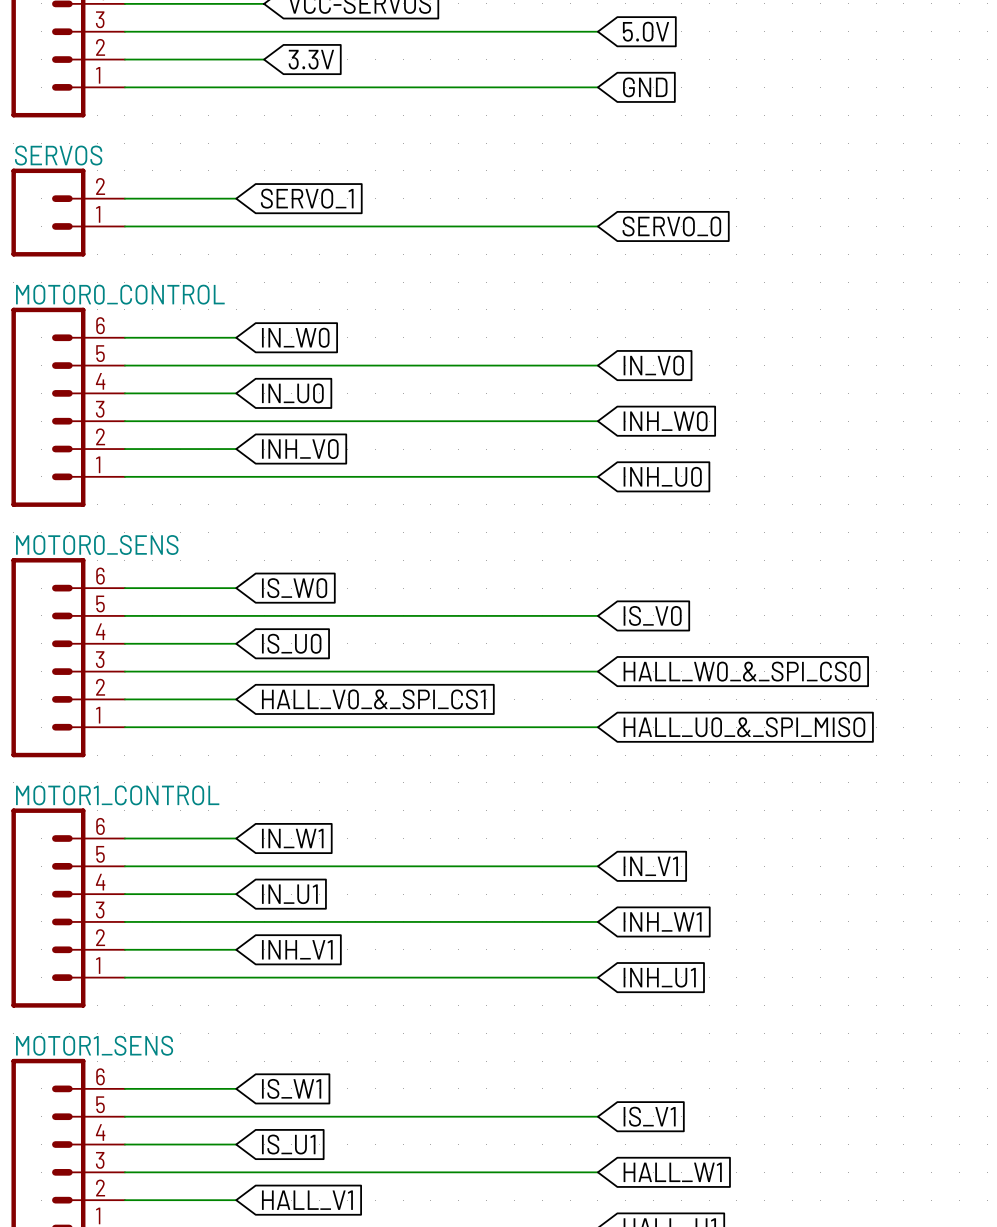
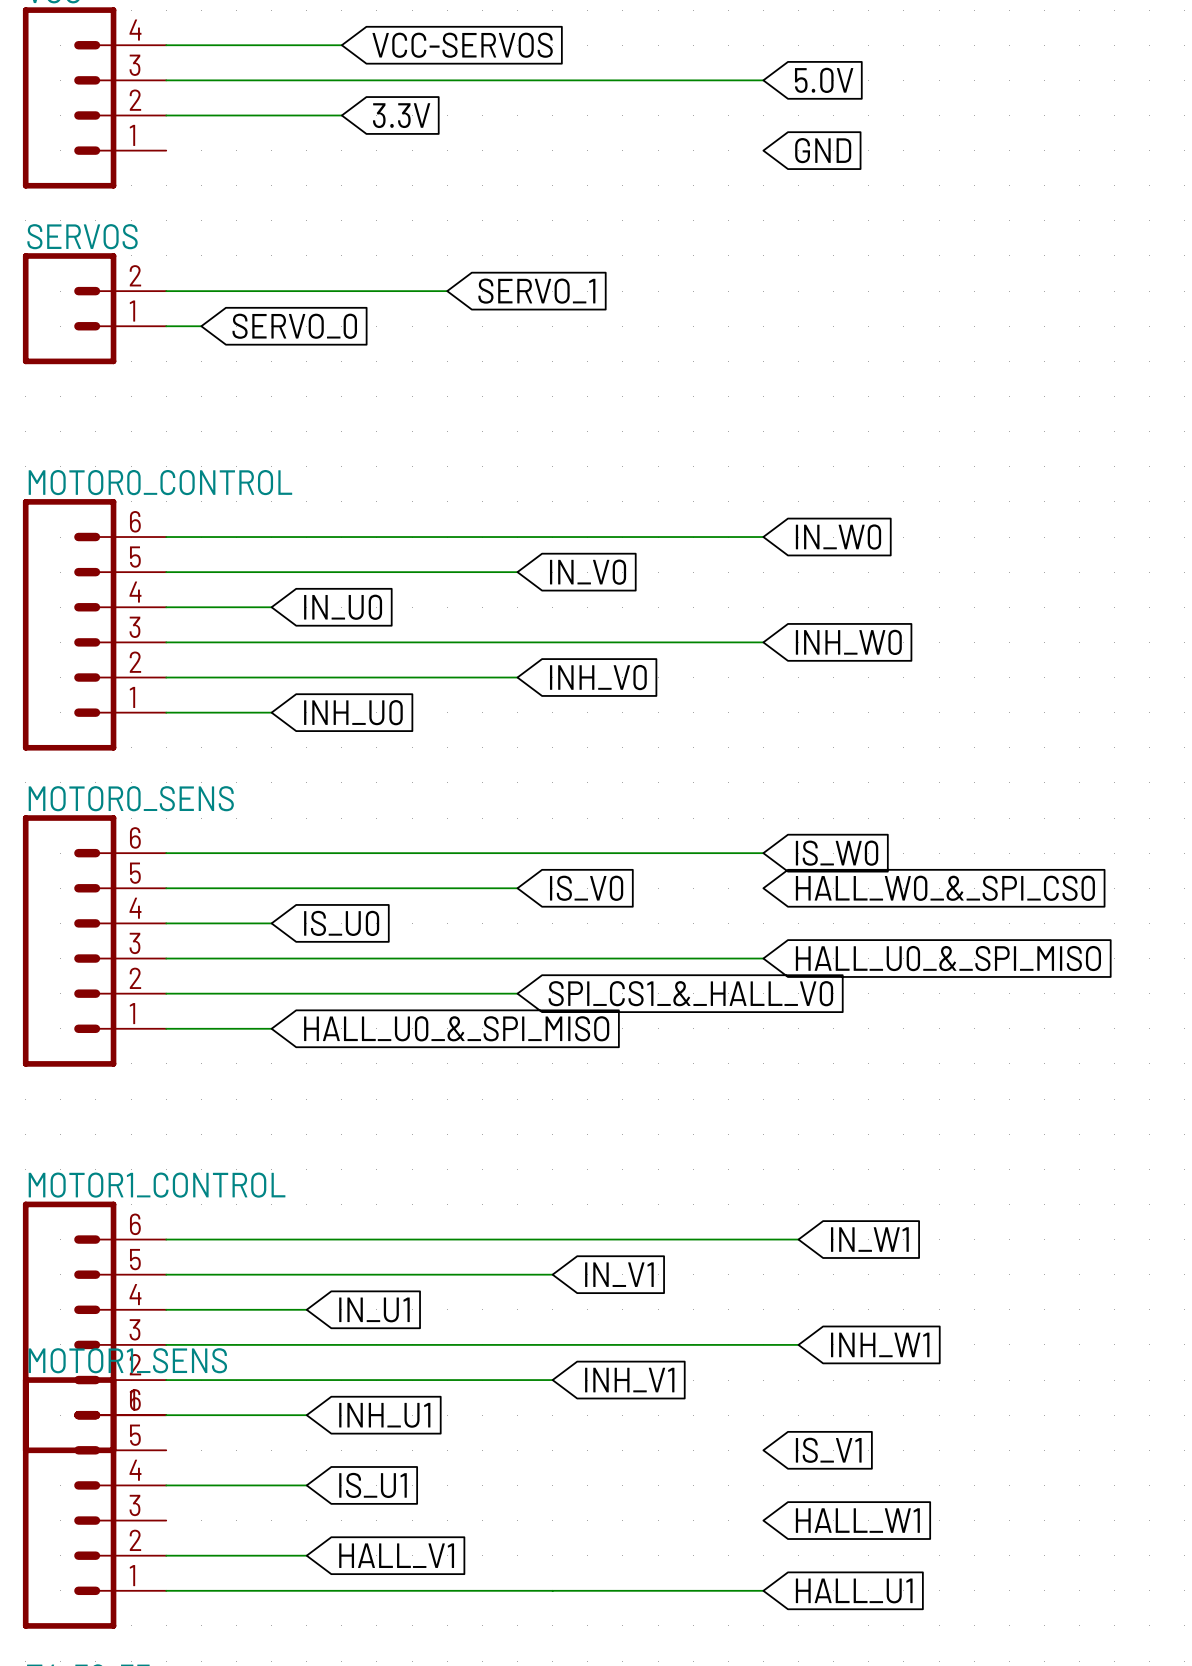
wire: (124, 87) (597, 87) -> none
global label position: SERVO_1 (307, 198) -> SERVO_1 (536, 291)
wire: (152, 226) (597, 226) -> none
global label: none -> SERVO_0 (294, 326)
global label: SERVO_0 (671, 226) -> none
wire: (124, 337) (236, 337) -> (306, 291) (447, 291)
global label: IN_W0 (295, 337) -> none
wire: (124, 365) (597, 365) -> none
global label position: IN_V0 (653, 365) -> IN_V0 (588, 572)
wire: none -> (306, 537) (763, 537)
global label position: IN_U0 (292, 393) -> IN_U0 (343, 607)
MOTOR0_CONTROL position: (68, 407) -> (94, 624)
wire: (403, 421) (597, 421) -> none
global label: INH_W0 (665, 421) -> IN_W0 (838, 537)
wire: (208, 449) (236, 449) -> none
global label position: INH_V0 (300, 449) -> INH_V0 (598, 677)
global label: INH_U0 (662, 476) -> INH_W0 (848, 642)
wire: none -> (166, 677) (517, 677)
wire: none -> (166, 712) (271, 712)
global label: none -> INH_U0 (353, 712)
wire: (124, 588) (236, 588) -> none
global label: IS_W0 (294, 588) -> none
wire: (124, 615) (597, 615) -> none
global label position: IS_V0 (652, 615) -> IS_V0 (586, 888)
wire: none -> (306, 853) (763, 853)
global label position: IS_U0 (291, 643) -> IS_U0 (341, 923)
global label: none -> IS_W0 (837, 853)
MOTOR0_SENS position: (68, 657) -> (94, 940)
wire: (403, 671) (597, 671) -> none
wire: (208, 699) (236, 699) -> none
global label: HALL_V0_&_SPI_CS1 (373, 699) -> none
wire: none -> (166, 993) (517, 993)
global label: none -> SPI_CS1_&_HALL_V0 (690, 993)
wire: none -> (166, 1028) (271, 1028)
global label: none -> HALL_U0_&_SPI_MISO (456, 1028)
wire: (124, 838) (236, 838) -> none
global label: IN_W1 (292, 838) -> none
wire: (124, 866) (597, 866) -> none
global label position: IN_V1 (650, 866) -> IN_V1 (619, 1274)
wire: (124, 894) (236, 894) -> (166, 1309) (306, 1309)
global label position: IN_U1 (289, 894) -> IN_U1 (374, 1309)
MOTOR1_CONTROL position: (68, 908) -> (94, 1327)
wire: (124, 921) (597, 921) -> none
global label position: INH_W1 (662, 921) -> INH_W1 (880, 1344)
wire: none -> (306, 1239) (798, 1239)
global label position: INH_V1 (297, 949) -> INH_V1 (629, 1380)
wire: (430, 977) (597, 977) -> none
global label: INH_U1 (659, 977) -> IN_W1 (869, 1239)
wire: none -> (166, 1344) (798, 1344)
wire: none -> (166, 1380) (552, 1380)
global label: IS_W1 (291, 1088) -> INH_U1 (384, 1415)
wire: (124, 1116) (597, 1116) -> none
wire: (124, 1172) (597, 1172) -> none

